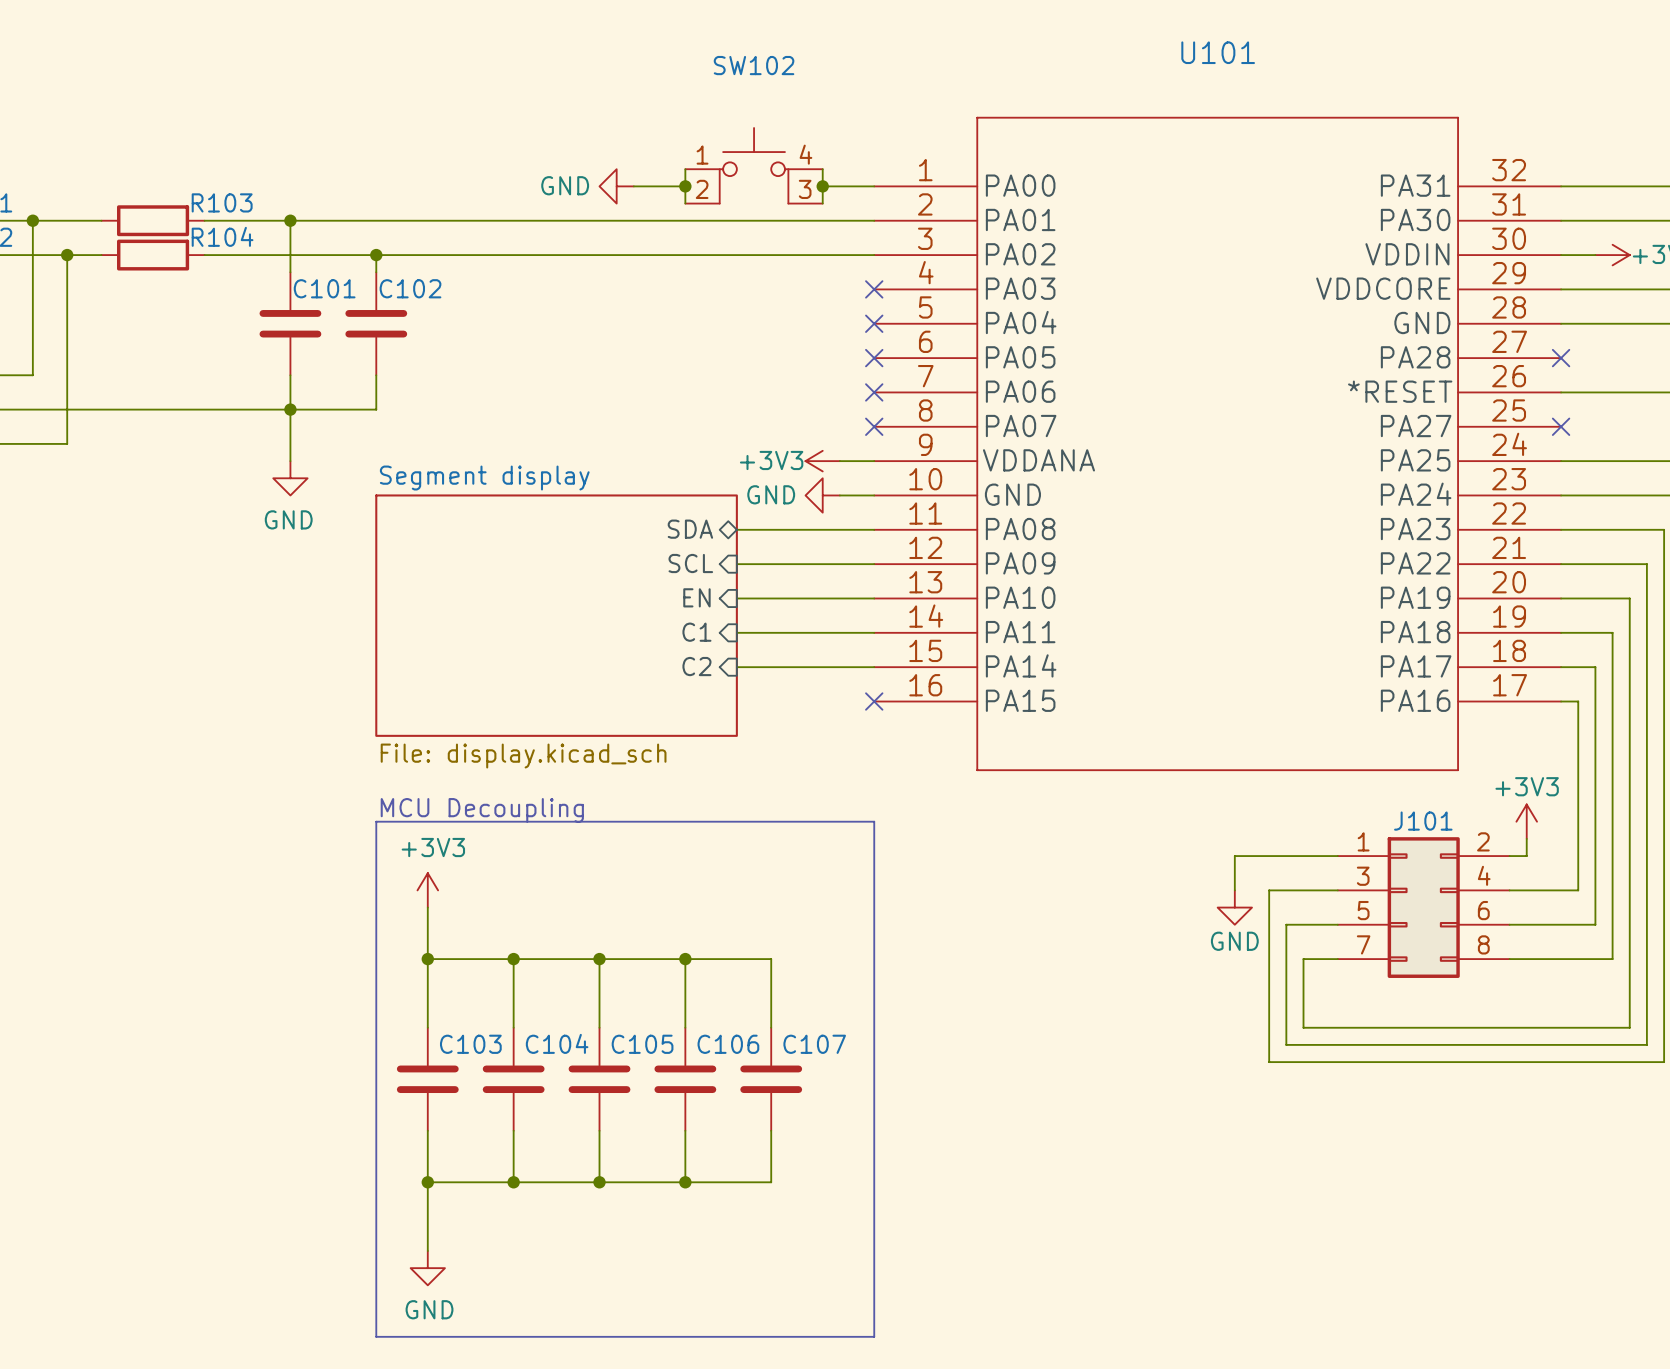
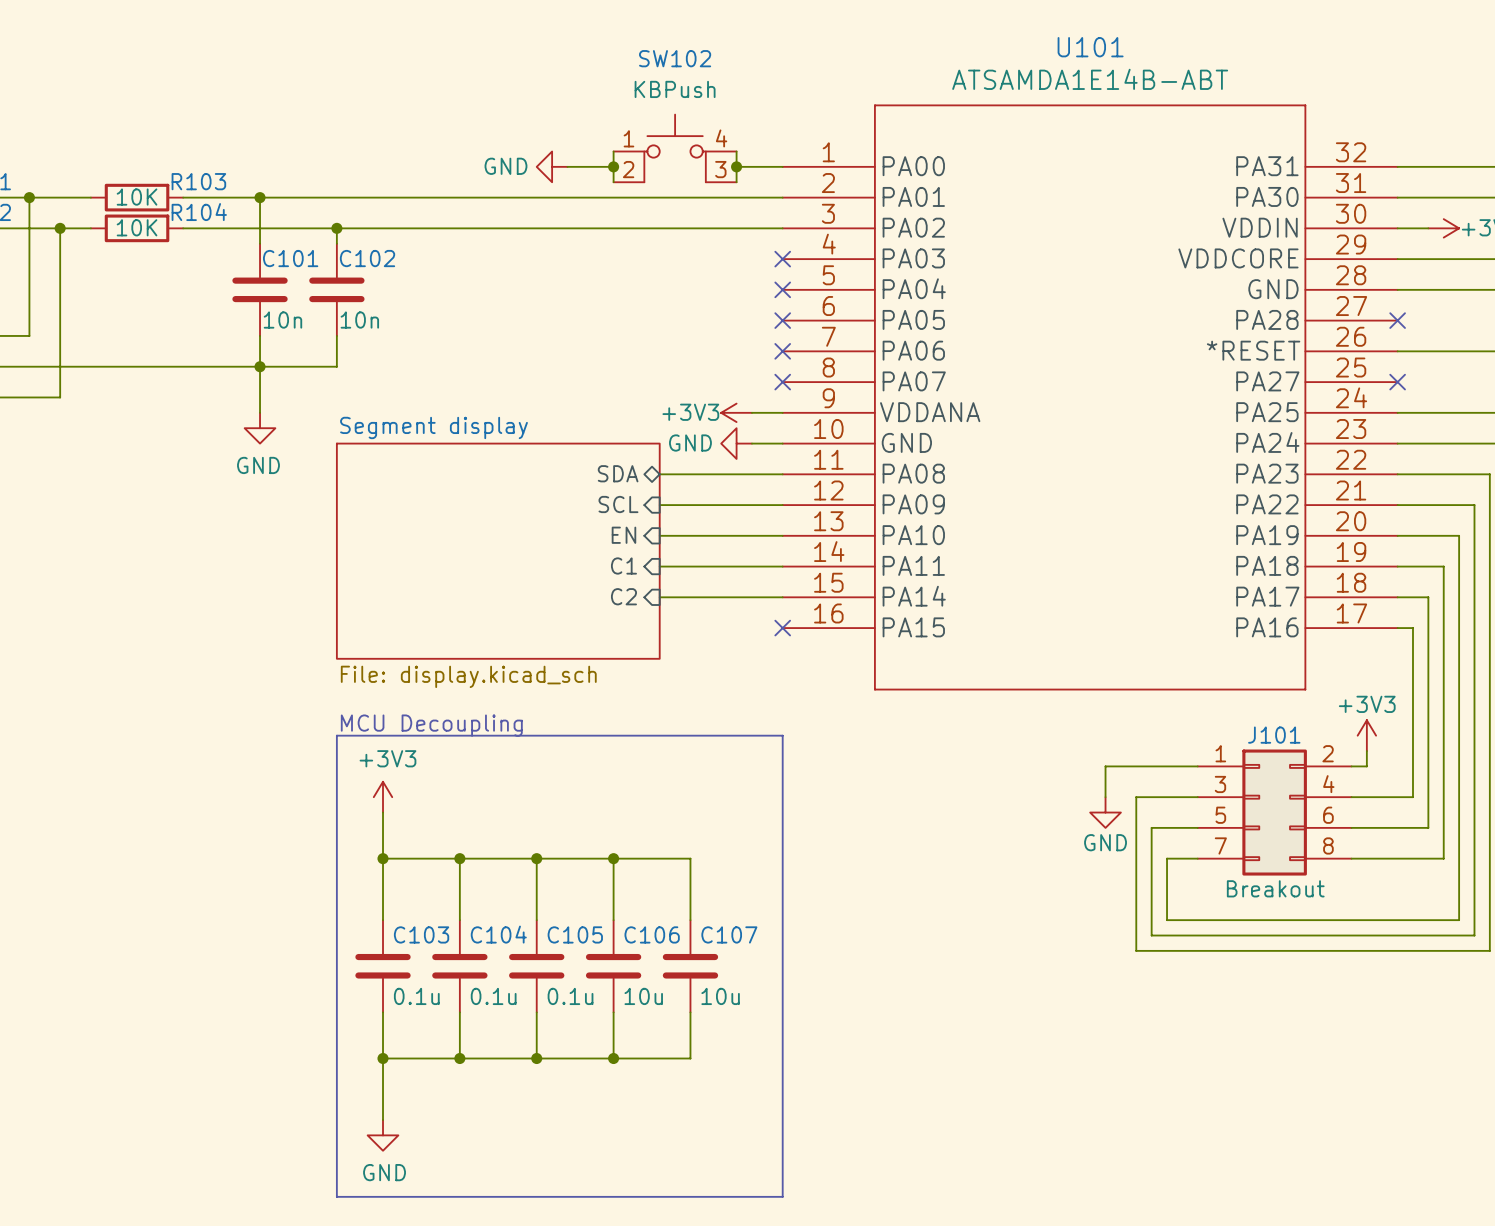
U101 value: none -> ATSAMDA1E14B-ABT (1090, 79)
SW102 value: none -> KBPush (675, 89)
R103 value: none -> 10K (137, 197)
R104 value: none -> 10K (137, 227)
C101 value: none -> 10n (282, 320)
C102 value: none -> 10n (359, 320)
J101 value: none -> Breakout (1275, 888)
C103 value: none -> 0.1u (416, 996)
C104 value: none -> 0.1u (493, 996)
C105 value: none -> 0.1u (570, 996)
C106 value: none -> 10u (643, 996)
C107 value: none -> 10u (720, 996)

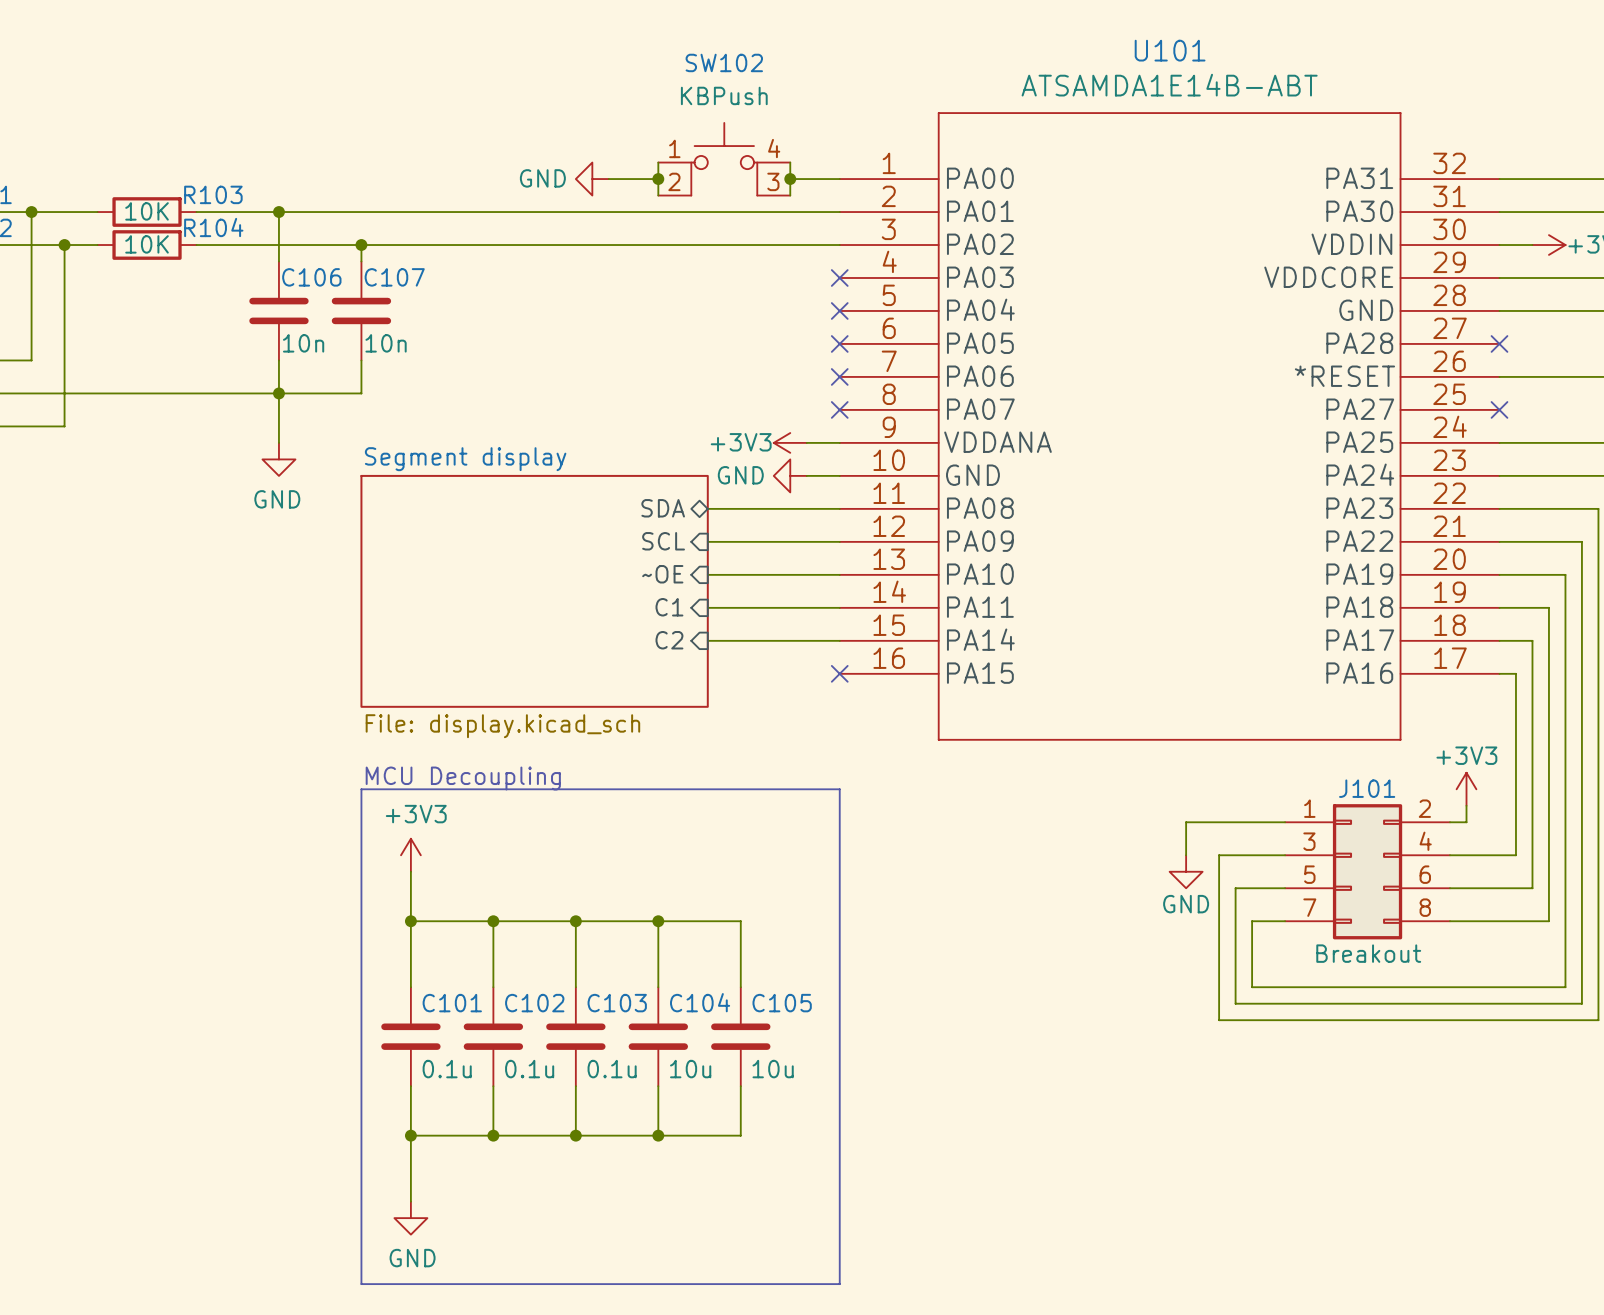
C101 name: C101 (290, 258) -> C106 (311, 277)
C102 name: C102 (367, 258) -> C107 (394, 277)
sheet pin: EN (623, 535) -> ~OE (662, 574)
C103 name: C103 (421, 934) -> C101 (452, 1003)
C104 name: C104 (498, 934) -> C102 (534, 1003)
C105 name: C105 (575, 934) -> C103 (617, 1003)
C106 name: C106 (652, 934) -> C104 (700, 1002)
C107 name: C107 (729, 934) -> C105 (782, 1003)

